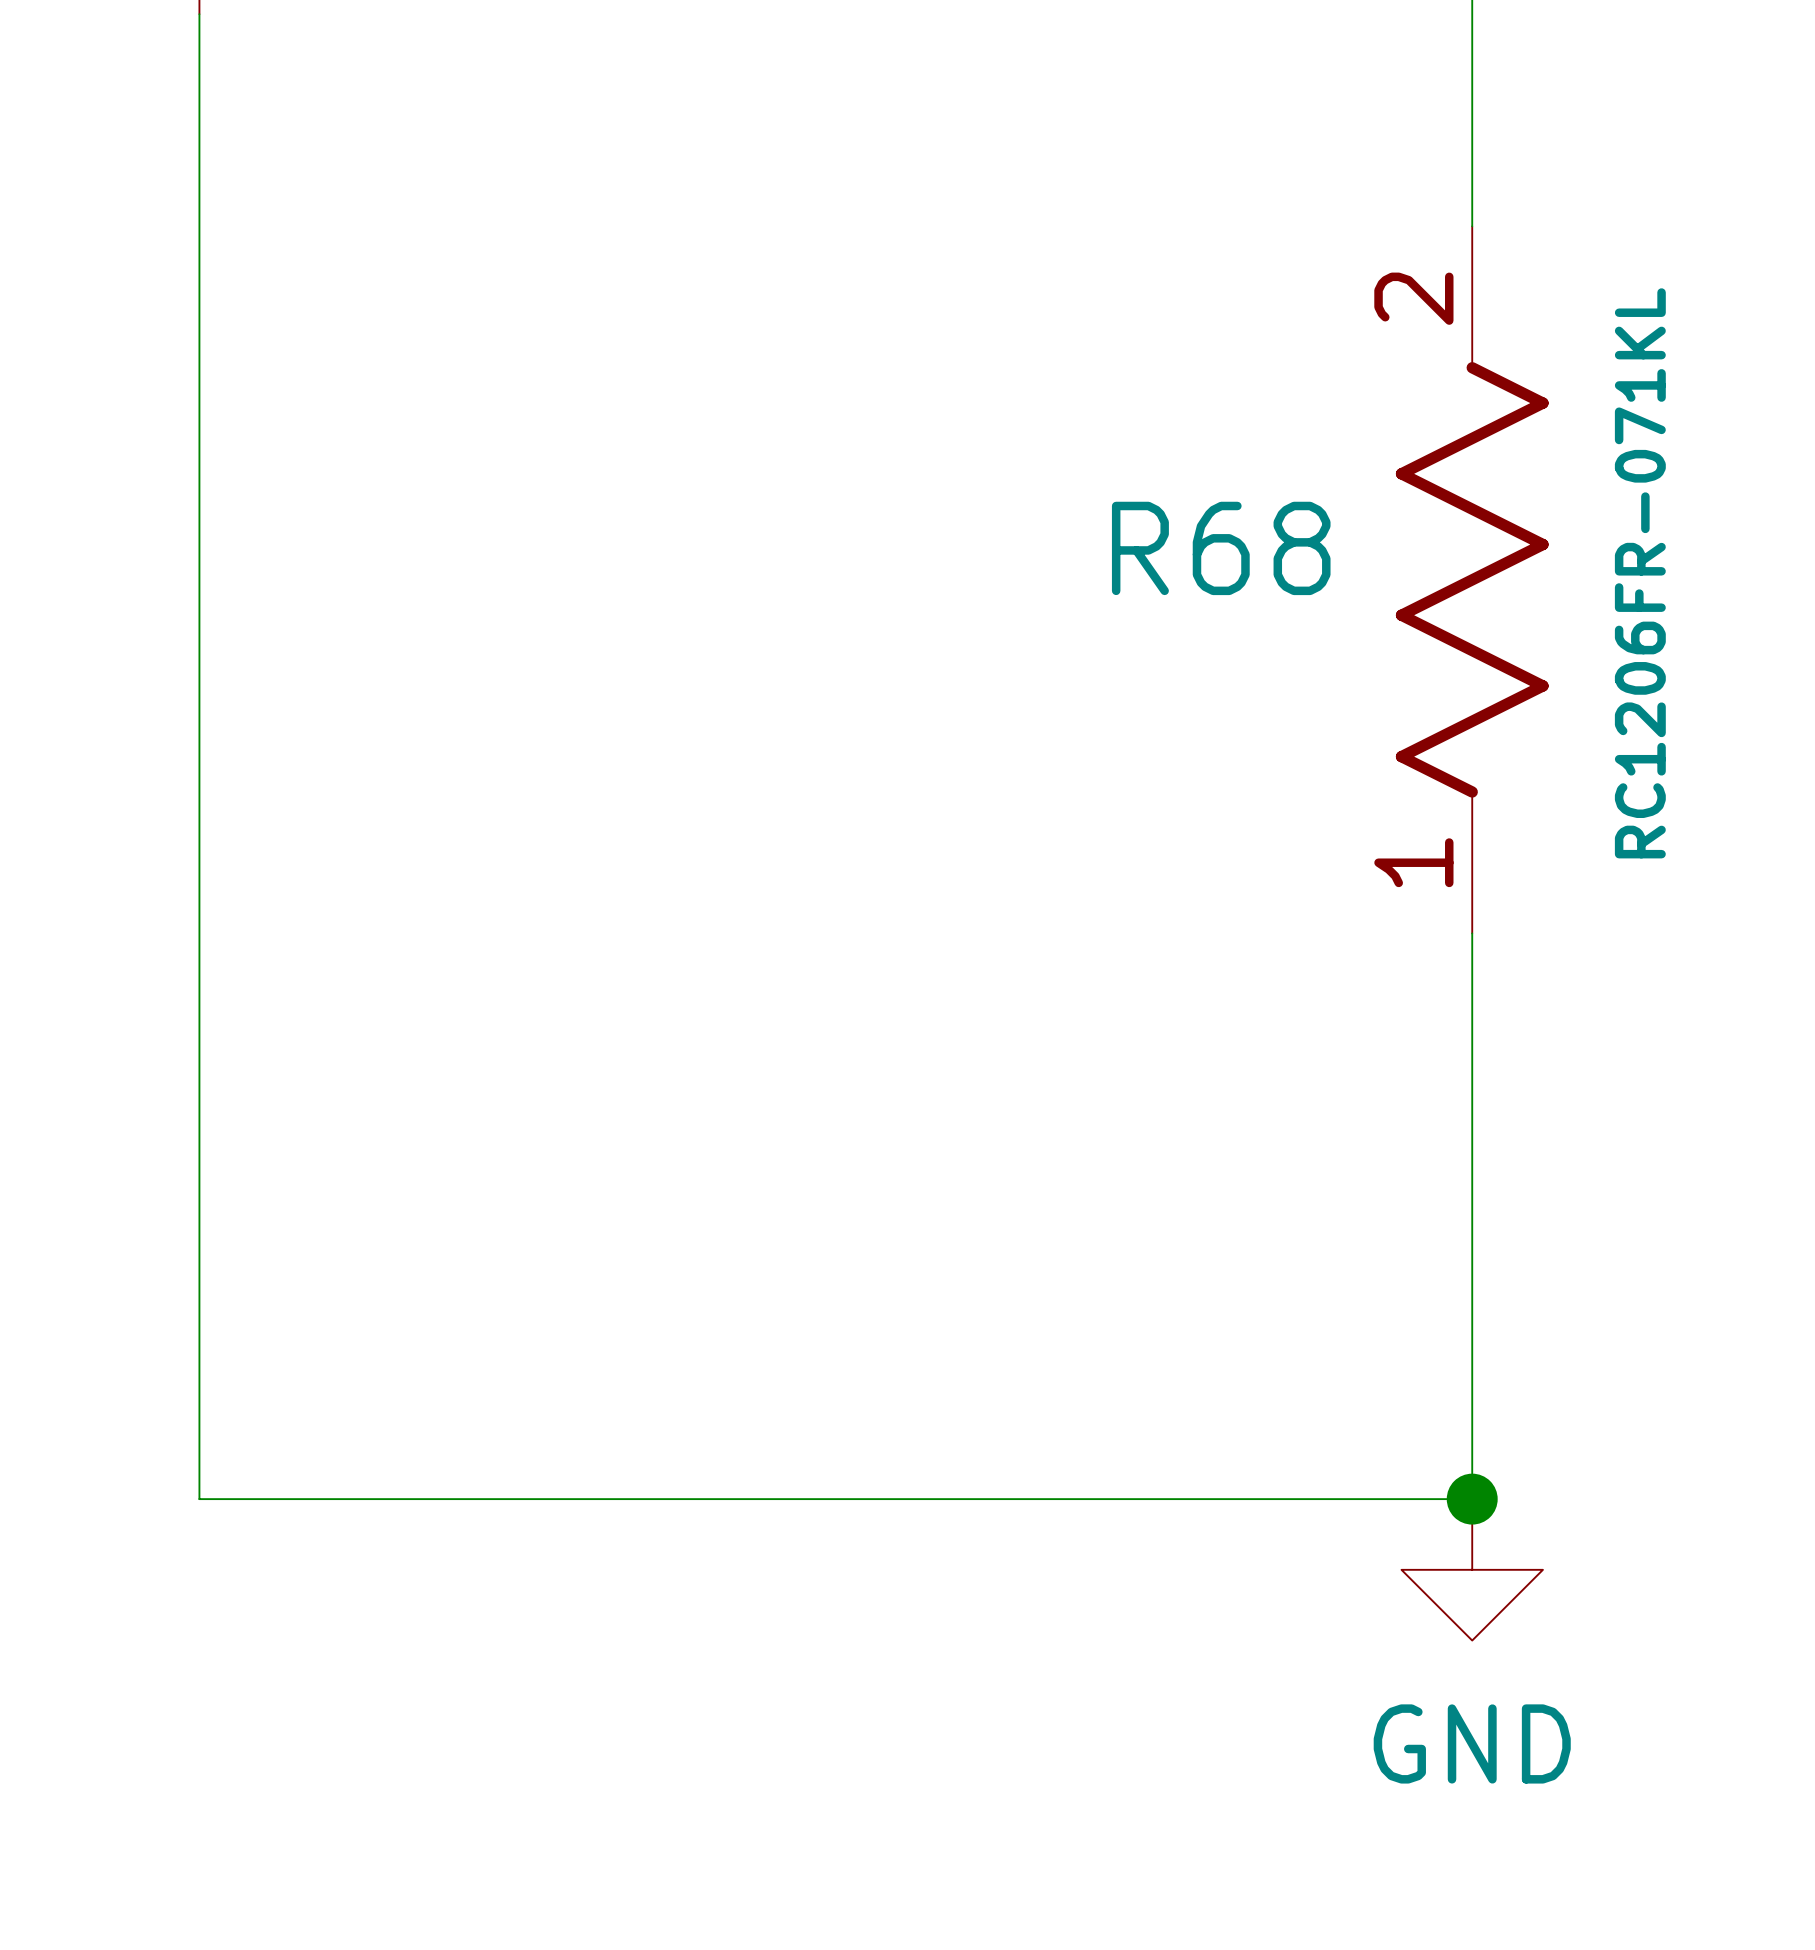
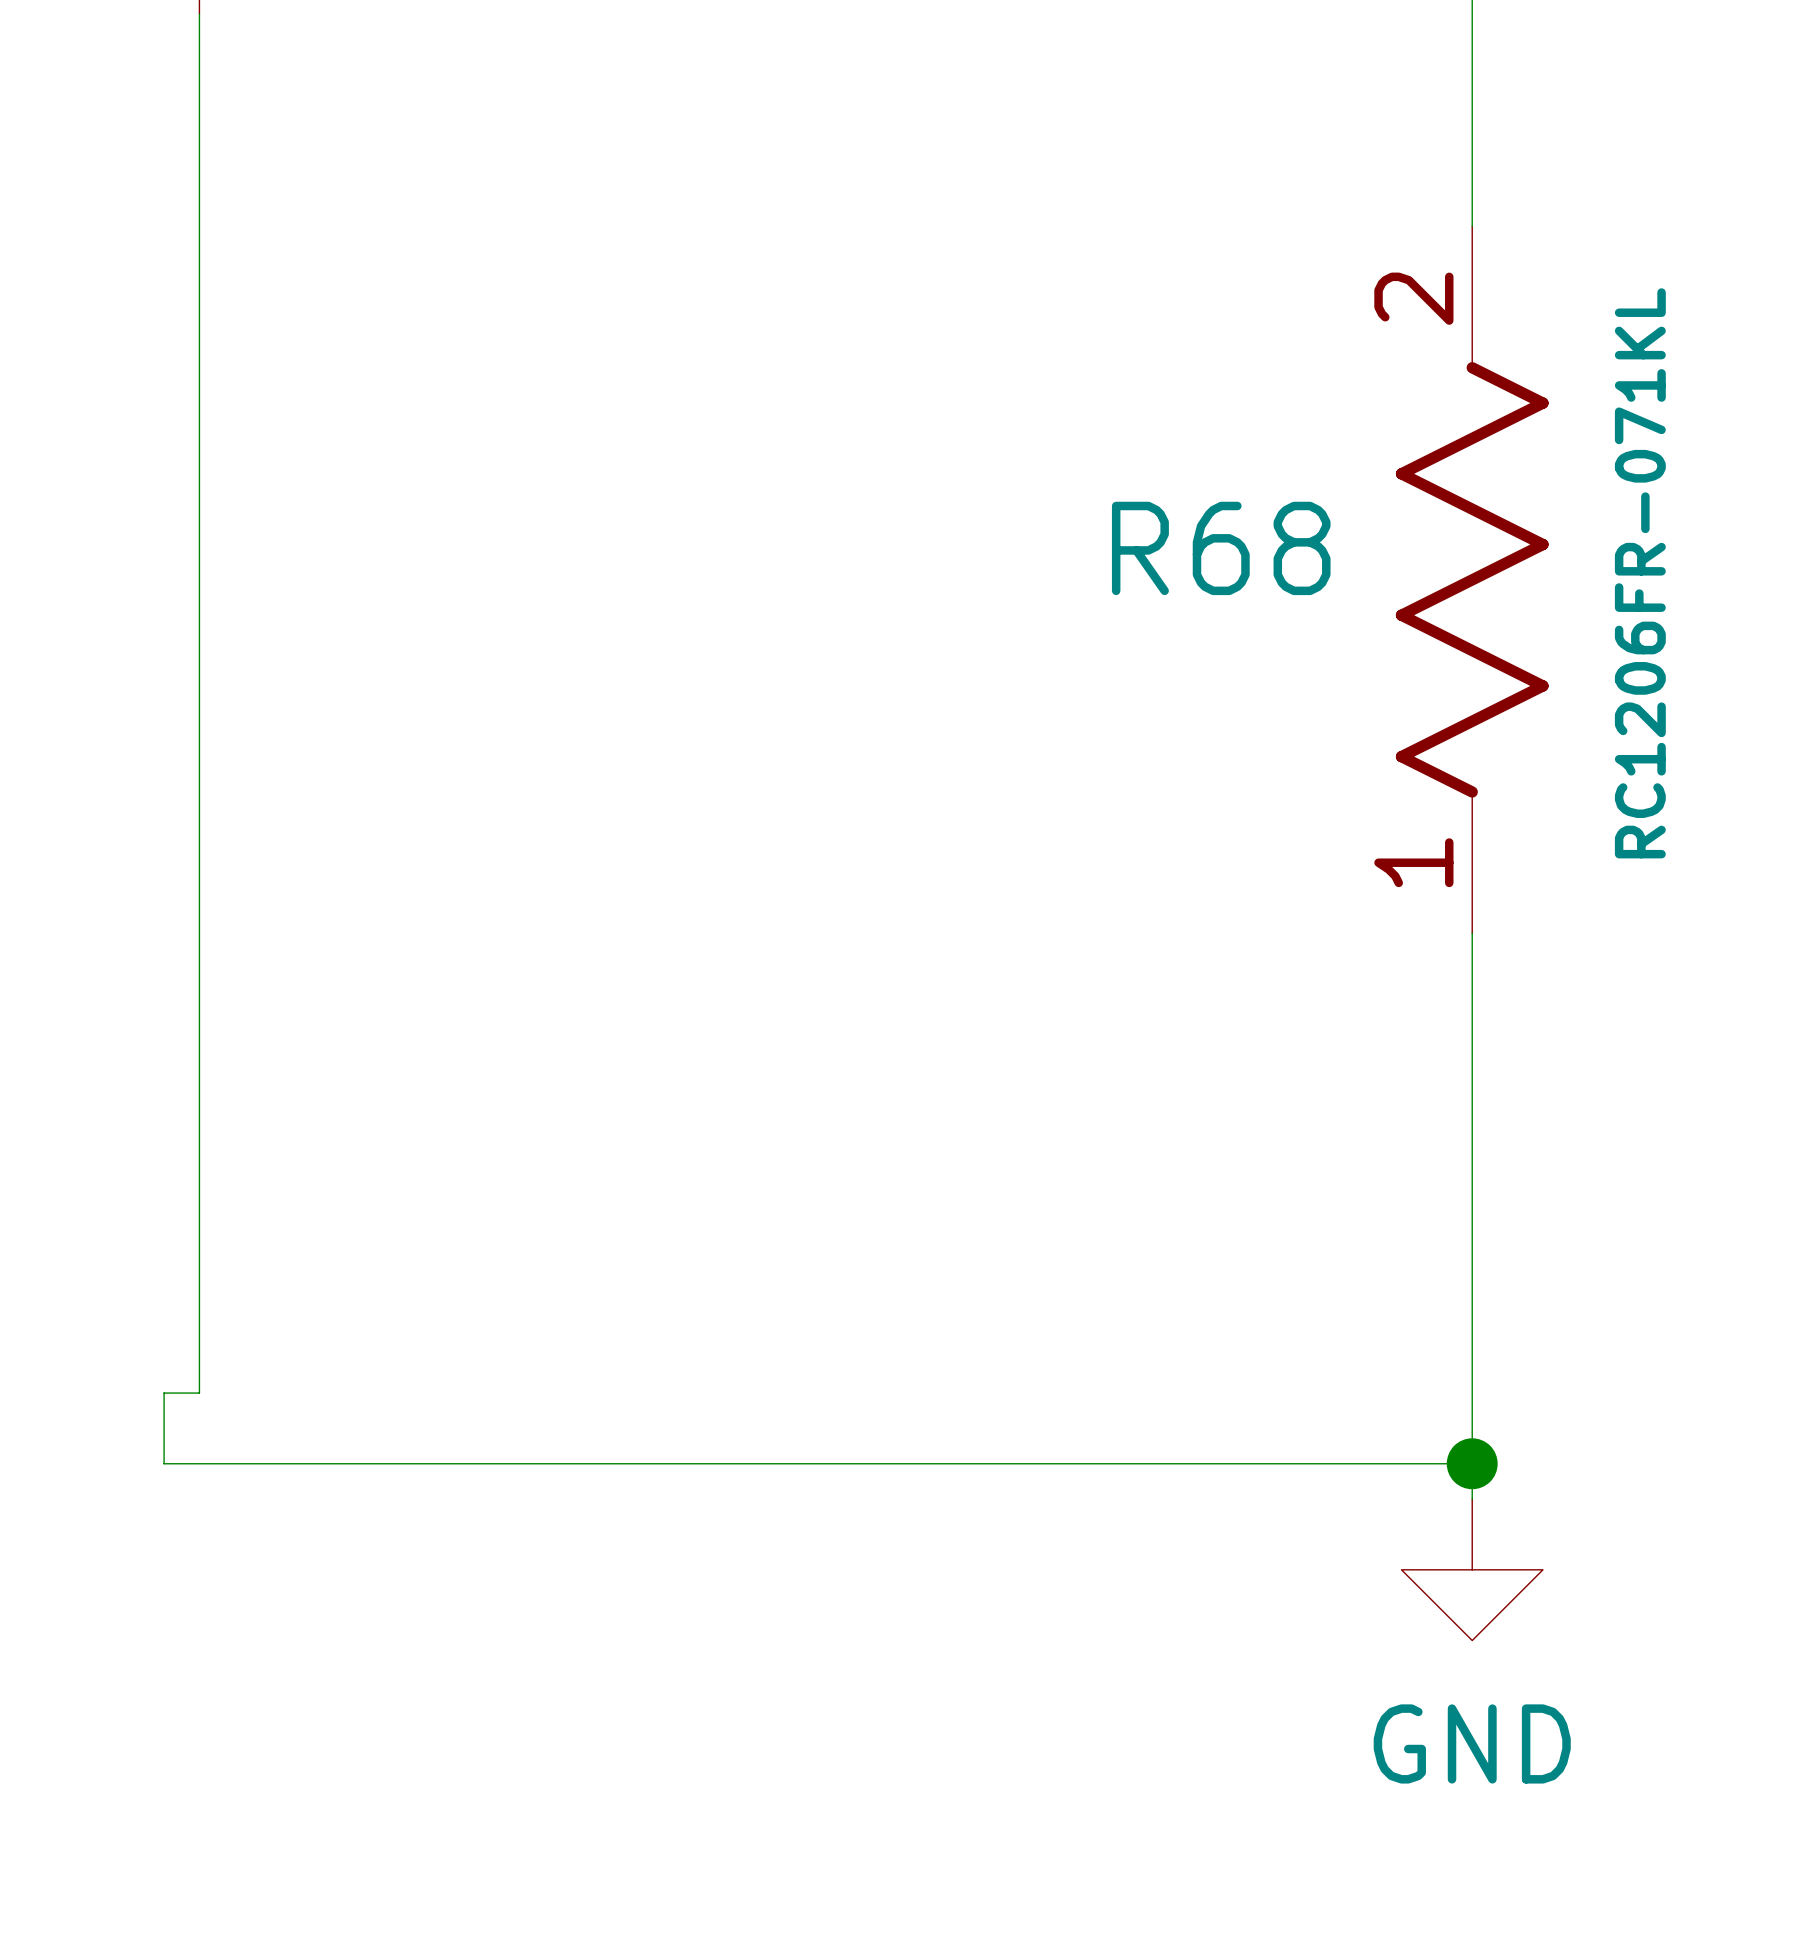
wire: (199, 1393) (199, 1499) (1472, 1499) -> (199, 1393) (164, 1393) (164, 1463) (1472, 1463)
junction position: (1472, 1499) -> (1472, 1463)

